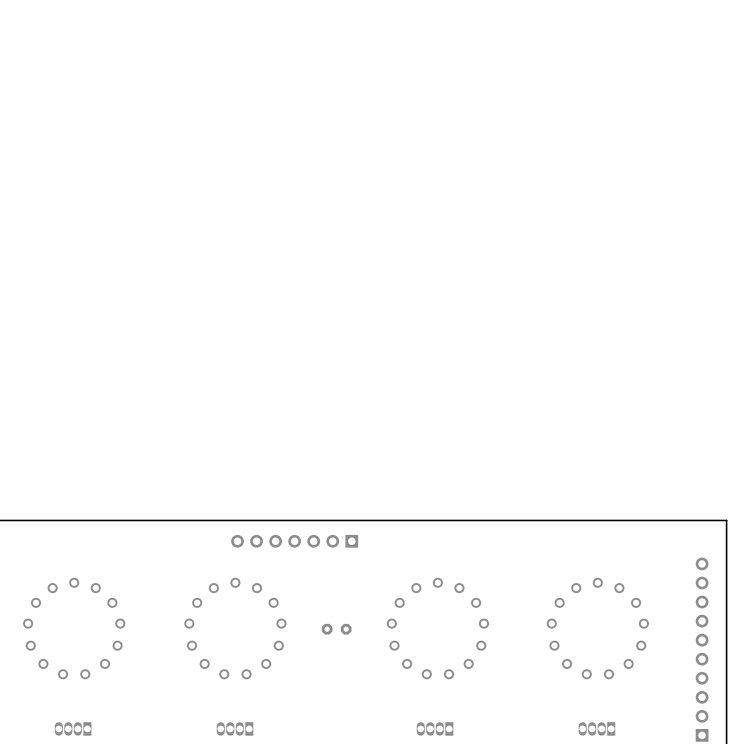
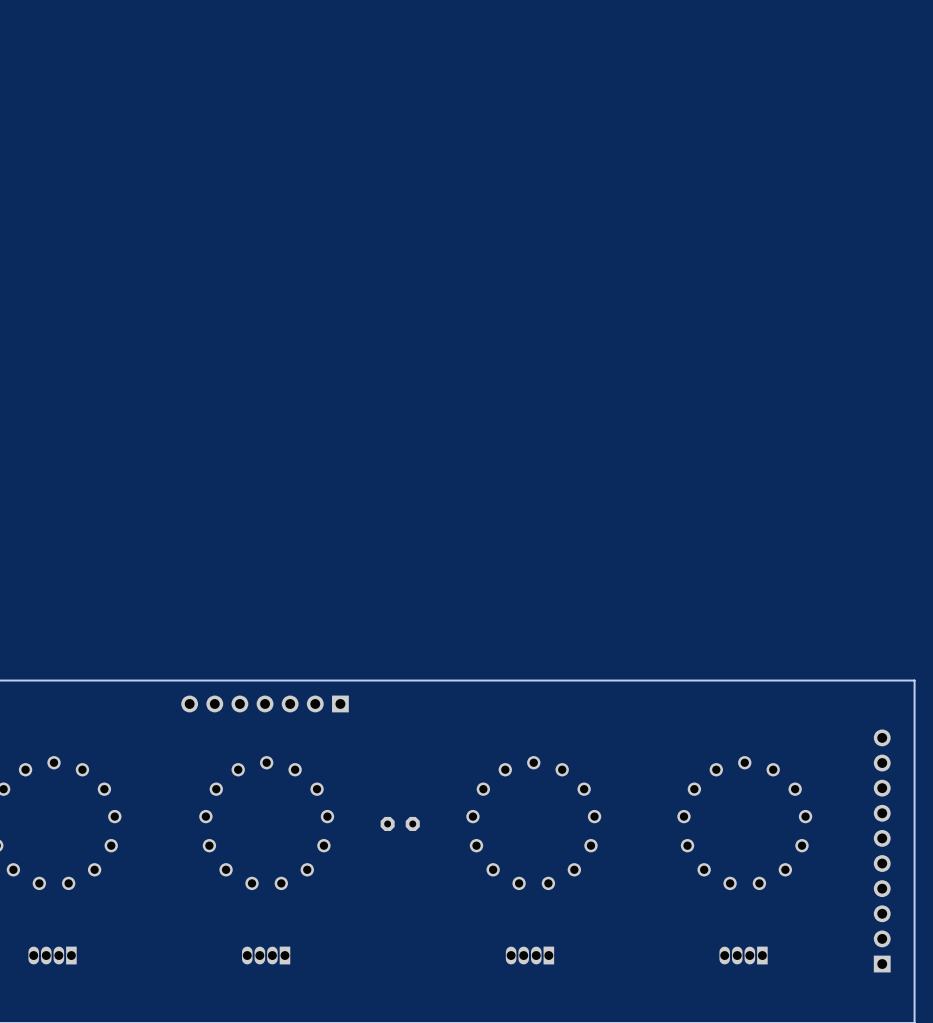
part position: (294, 541) -> (265, 703)

